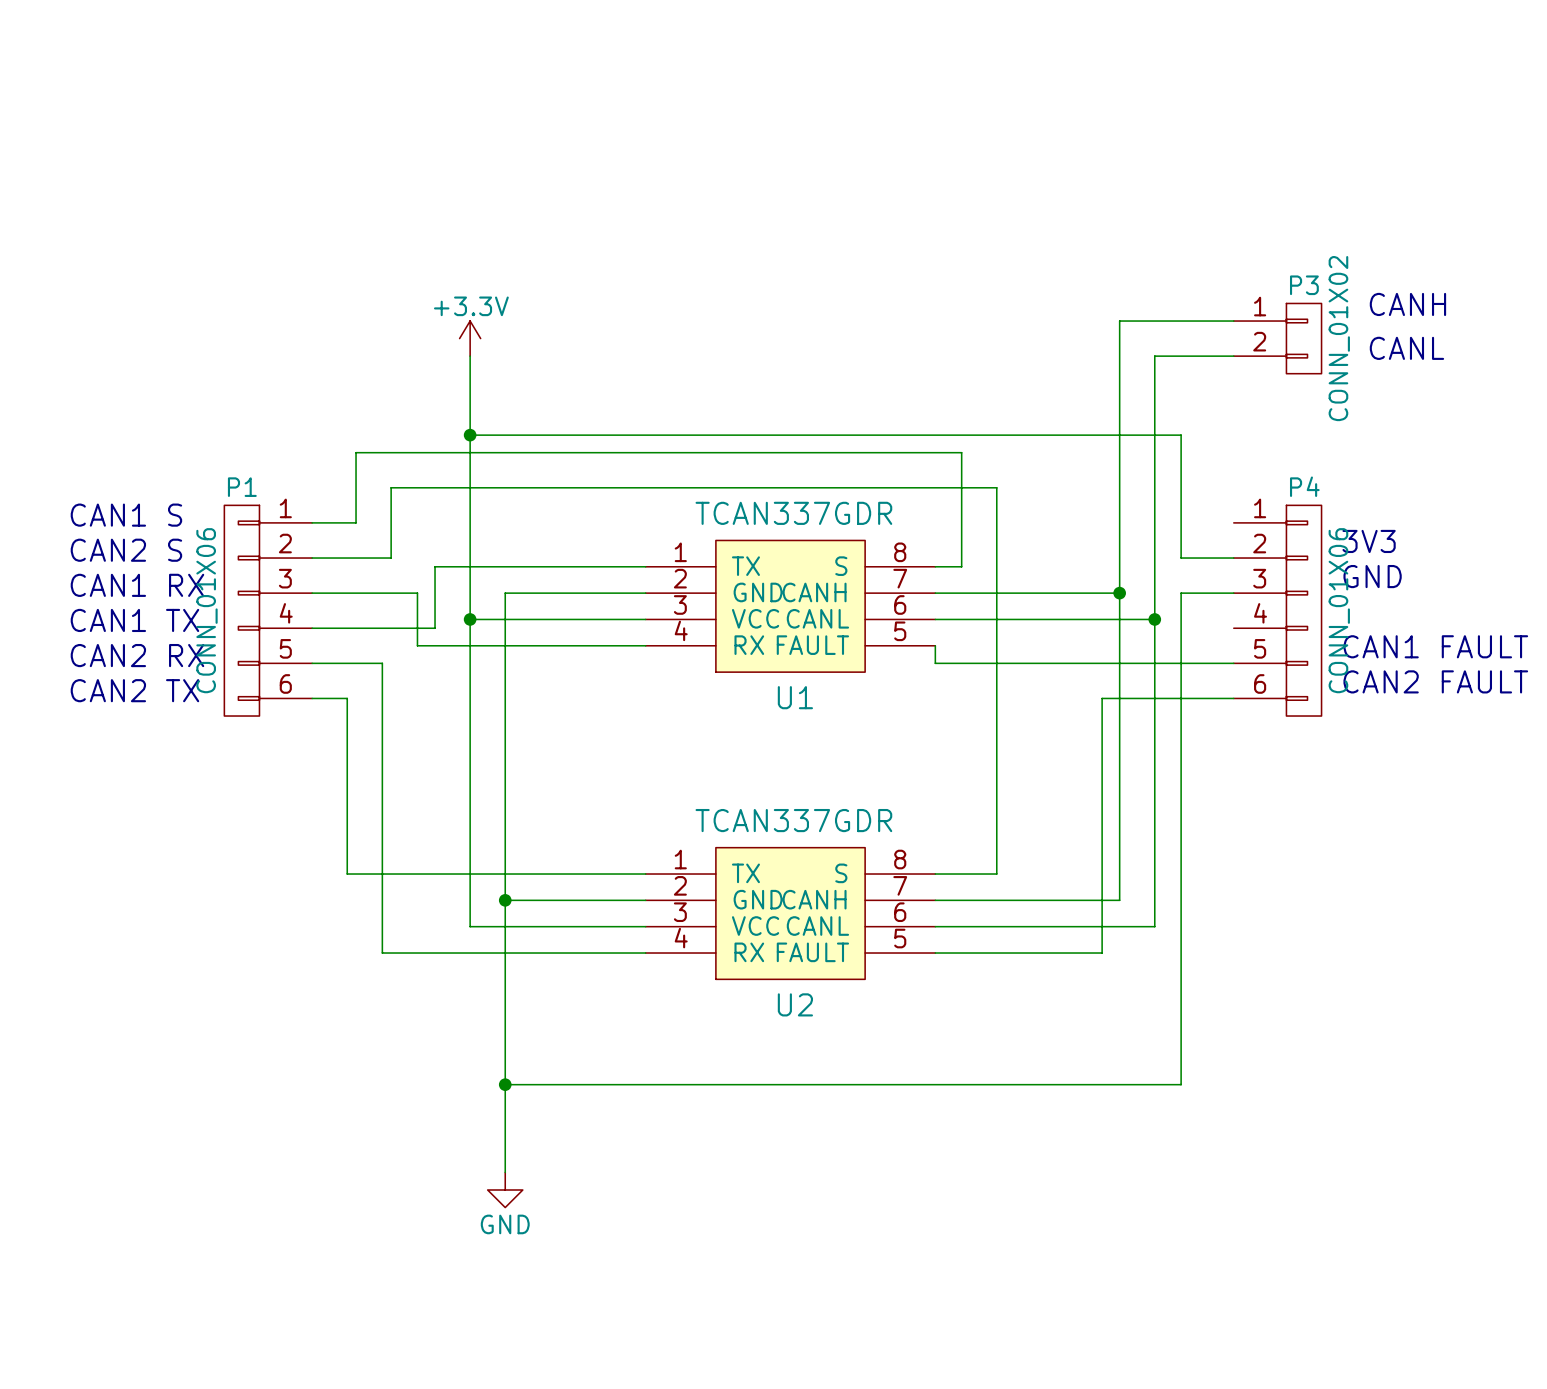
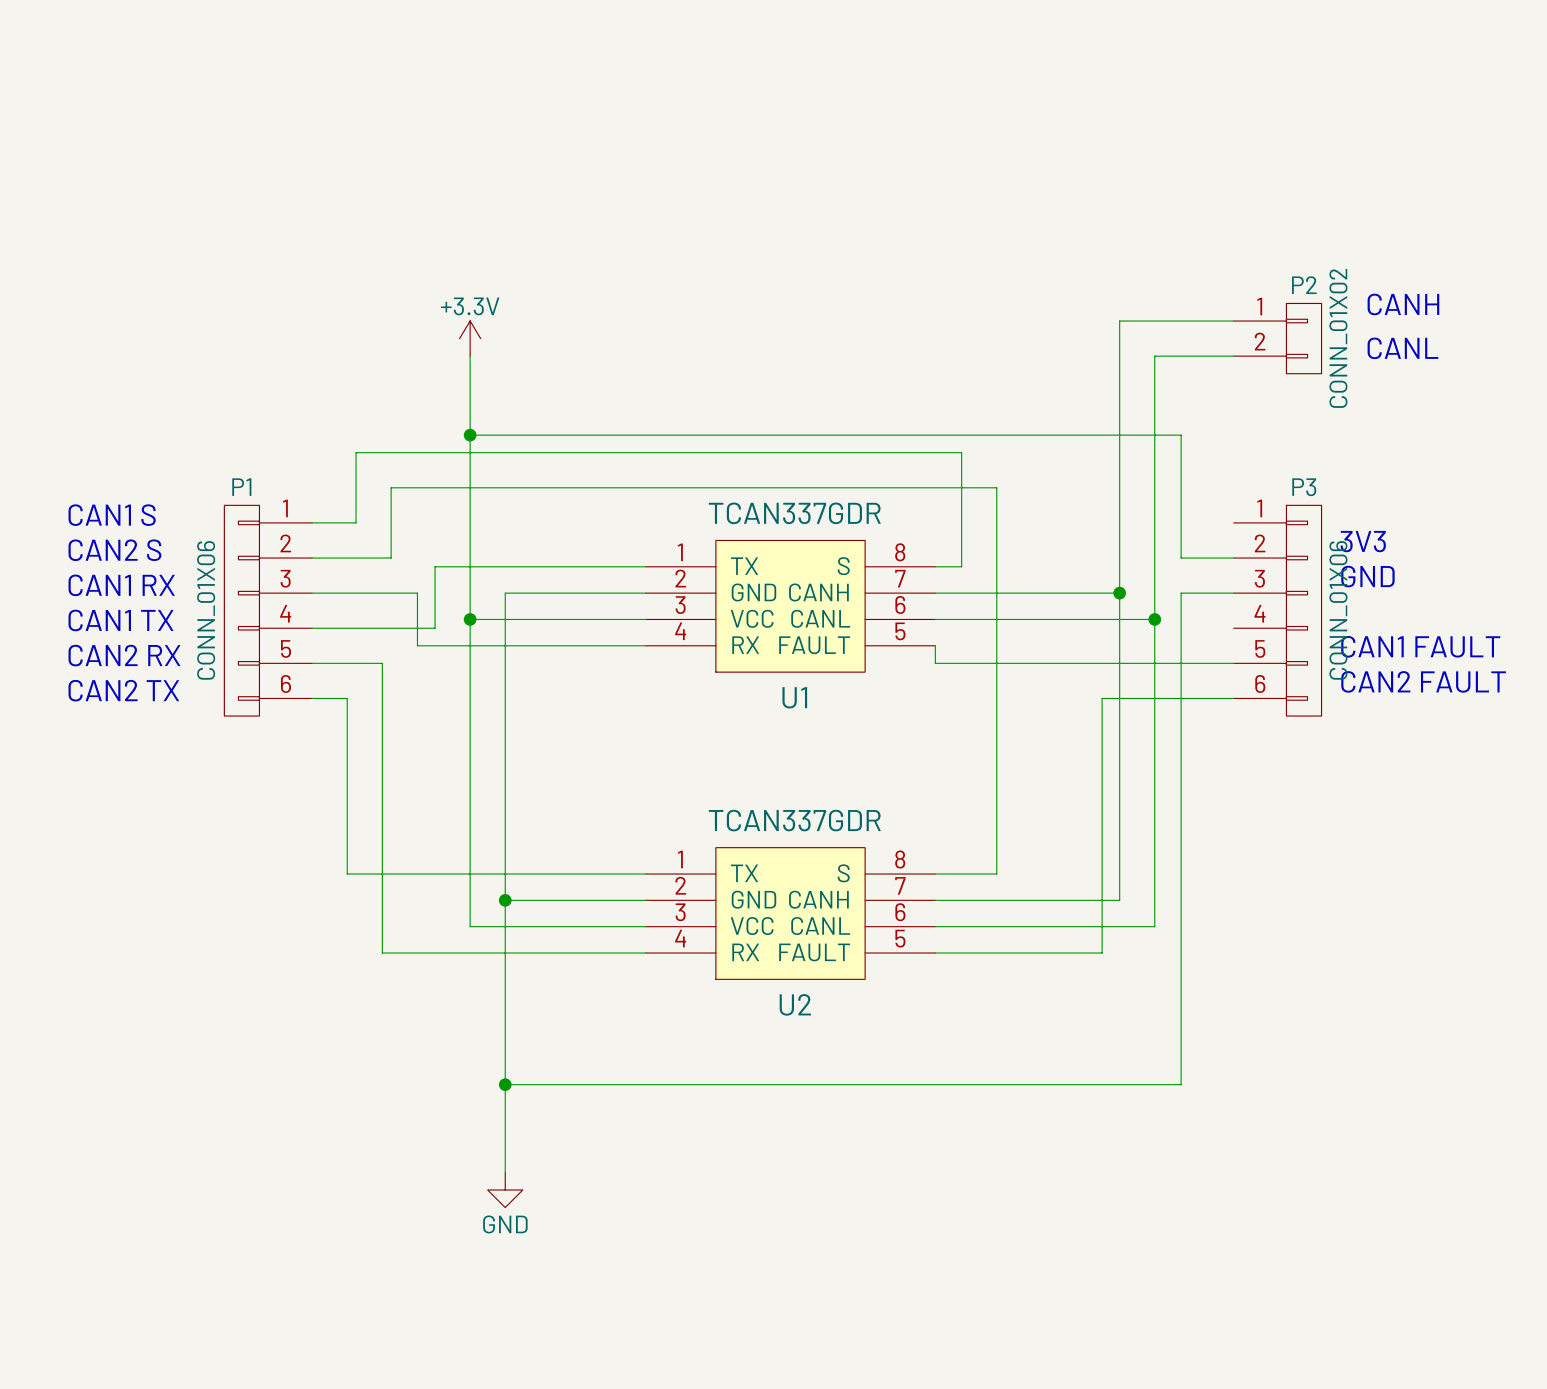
P3 name: P3 (1304, 285) -> P2 (1304, 285)
P4 name: P4 (1304, 486) -> P3 (1304, 487)

